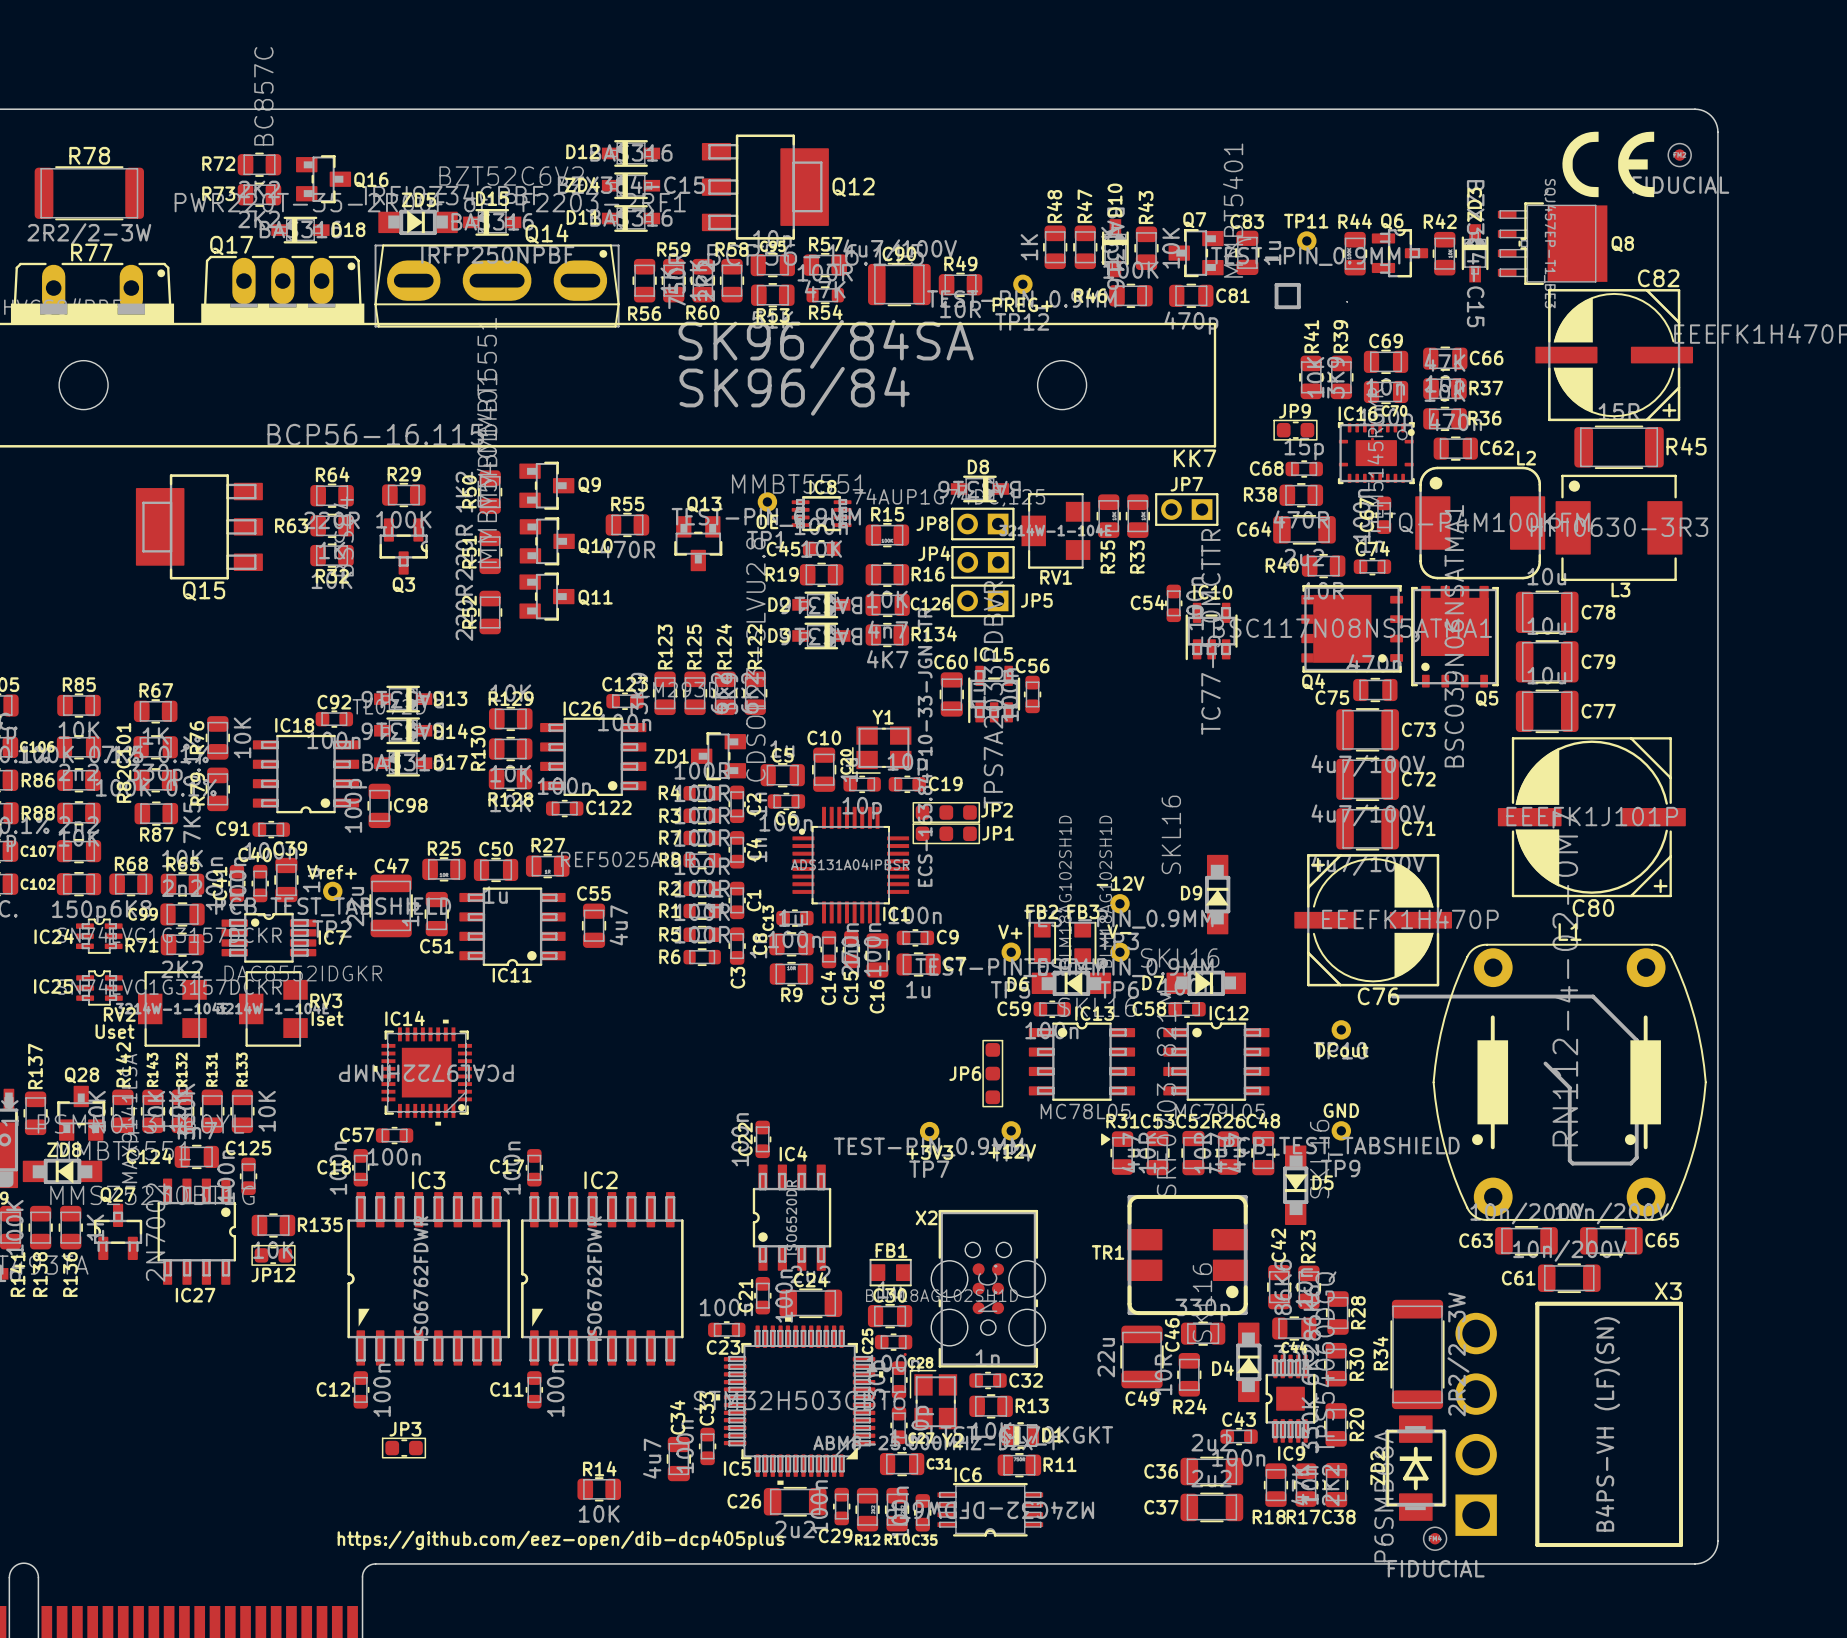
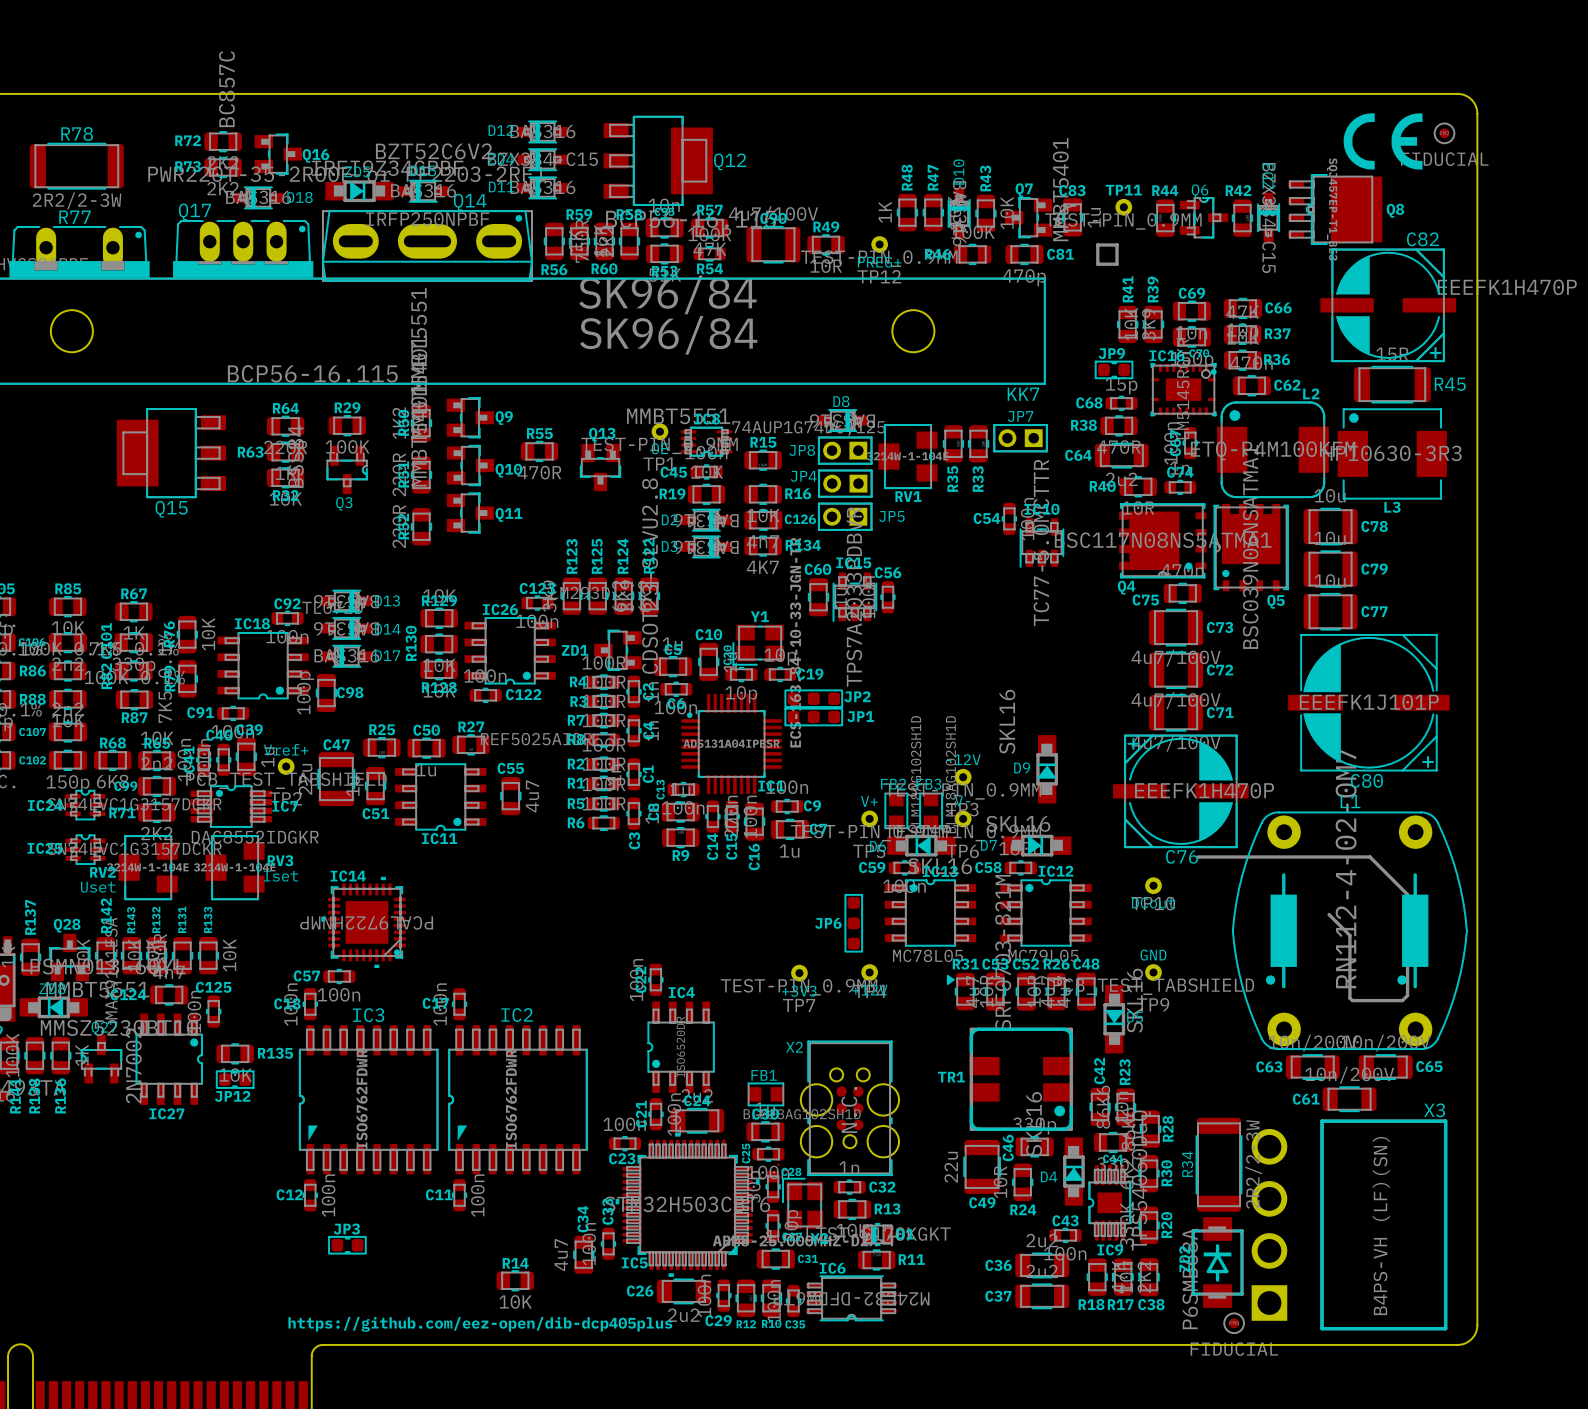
KK7 value: SK96/84SA (826, 344) -> SK96/84 (667, 294)

